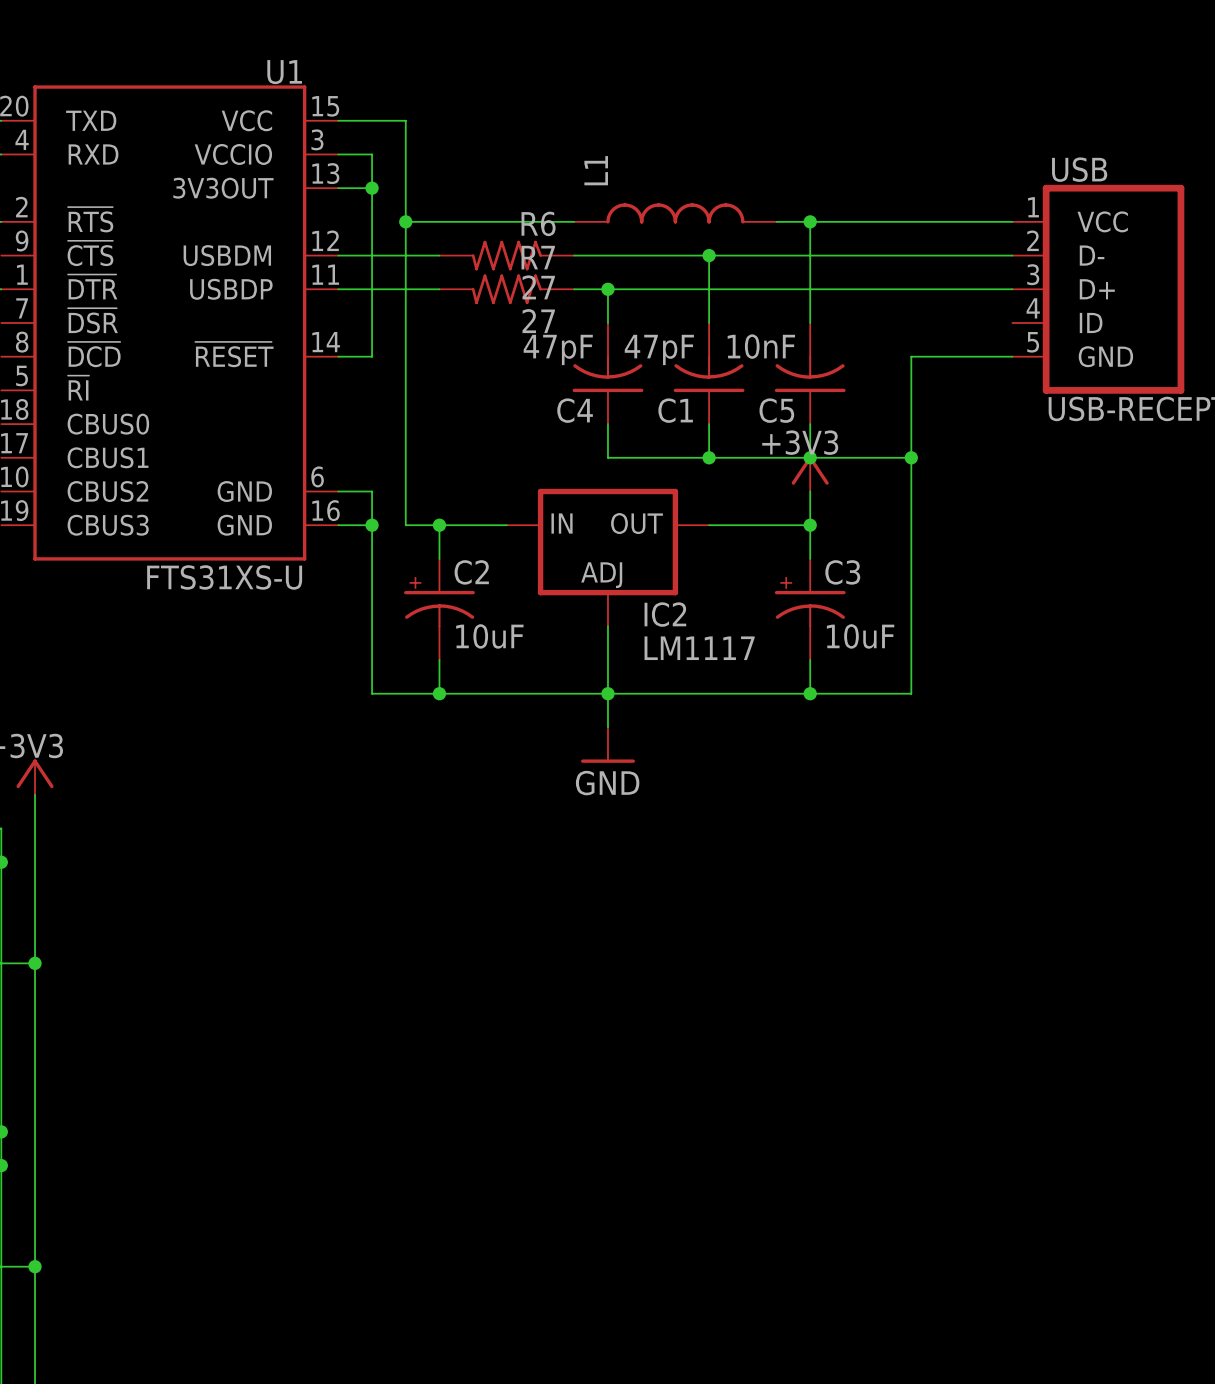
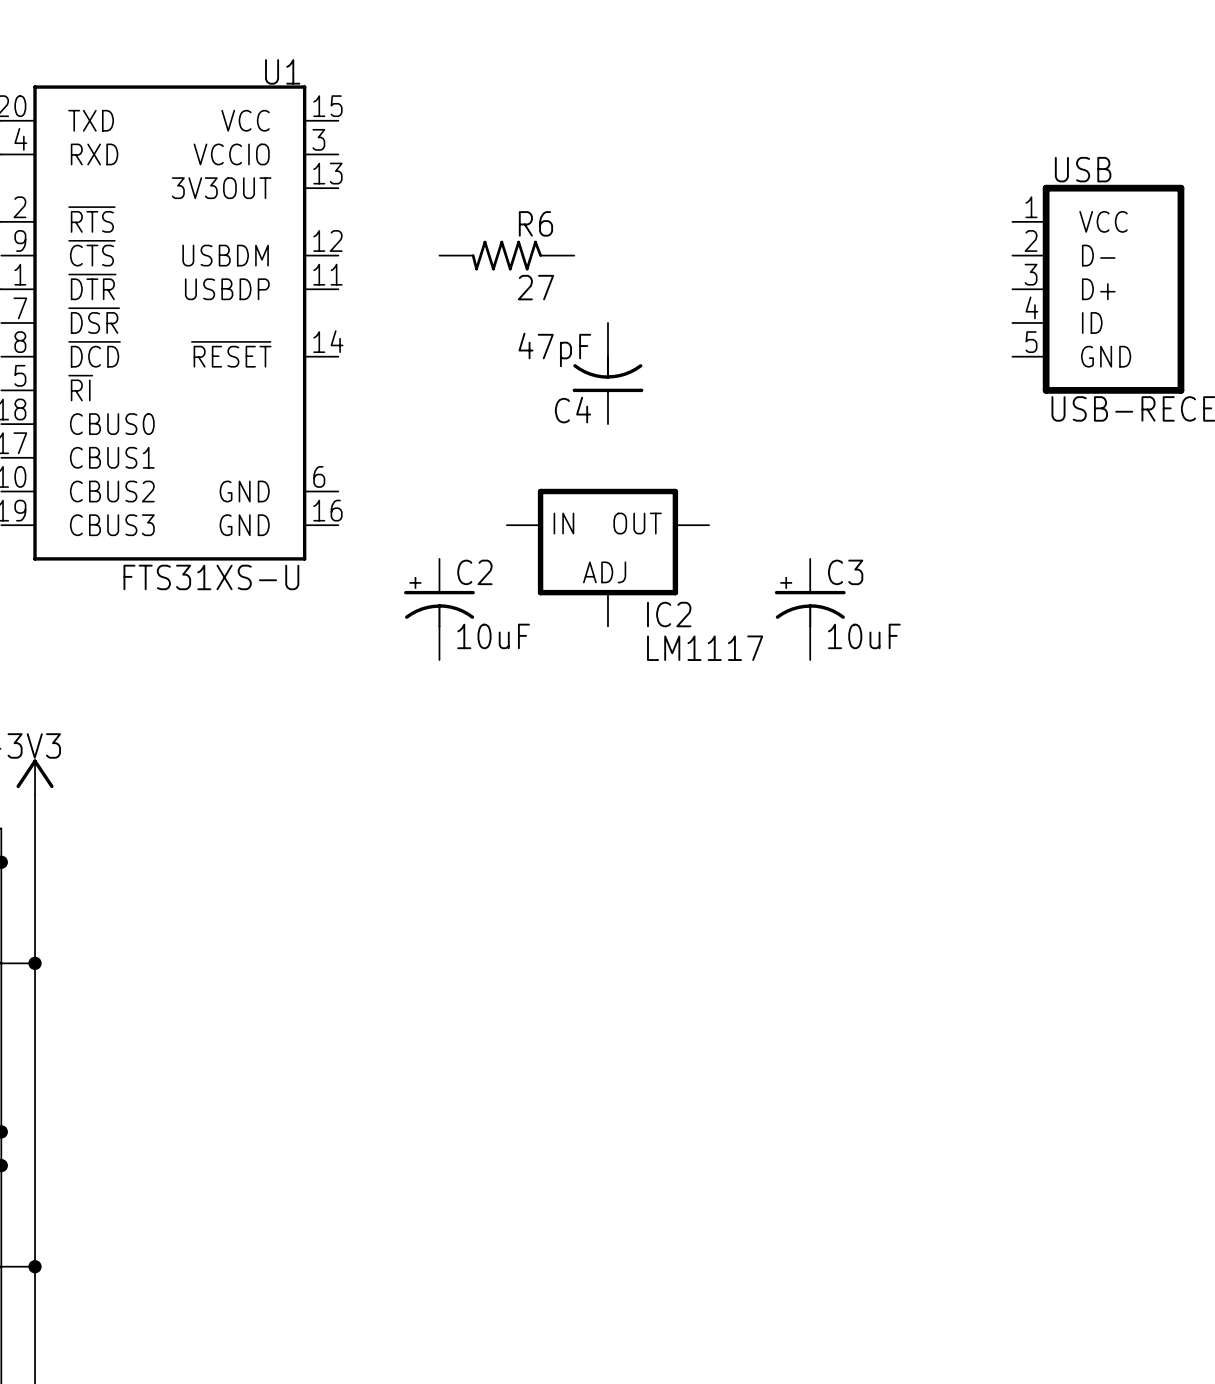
wire: (338, 120) (405, 120) (405, 525) (506, 525) -> none
wire: (338, 154) (372, 154) (372, 356) (338, 356) -> none
wire: (338, 188) (372, 188) -> none
junction: (372, 188) -> none
L1: (675, 213) -> none
wire: (405, 221) (574, 221) -> none
junction: (405, 221) -> none
wire: (776, 221) (1012, 221) -> none
wire: (810, 221) (810, 322) -> none
junction: (810, 221) -> none
wire: (338, 255) (439, 255) -> none
wire: (574, 255) (1012, 255) -> none
wire: (709, 255) (709, 322) -> none
junction: (709, 255) -> none
wire: (338, 289) (439, 289) -> none
R7: 27 (506, 289) -> none
wire: (574, 289) (1012, 289) -> none
wire: (607, 289) (607, 322) -> none
junction: (607, 289) -> none
wire: (1012, 356) (911, 356) (911, 693) (372, 693) (372, 491) (338, 491) -> none
C1: 47pF (709, 373) -> none
C5: 10nF (810, 373) -> none
wire: (607, 424) (607, 457) (911, 457) -> none
wire: (709, 424) (709, 457) -> none
wire: (810, 424) (810, 457) -> none
junction: (709, 457) -> none
junction: (810, 457) -> none
junction: (911, 457) -> none
power symbol: +3V3 (810, 473) -> none
wire: (810, 491) (810, 558) -> none
wire: (338, 525) (372, 525) -> none
junction: (372, 525) -> none
wire: (439, 525) (439, 558) -> none
junction: (439, 525) -> none
wire: (709, 525) (810, 525) -> none
junction: (810, 525) -> none
wire: (607, 626) (607, 727) -> none
wire: (439, 660) (439, 693) -> none
wire: (810, 660) (810, 693) -> none
junction: (439, 693) -> none
junction: (607, 693) -> none
junction: (810, 693) -> none
power symbol: GND (607, 745) -> none

